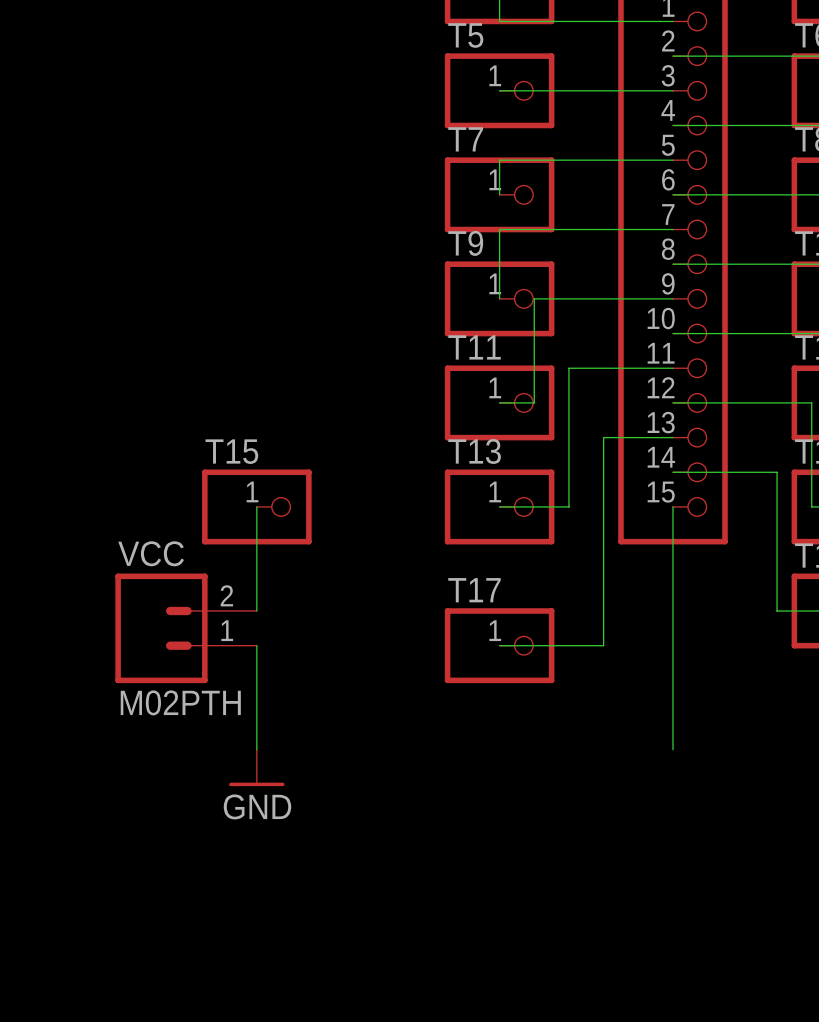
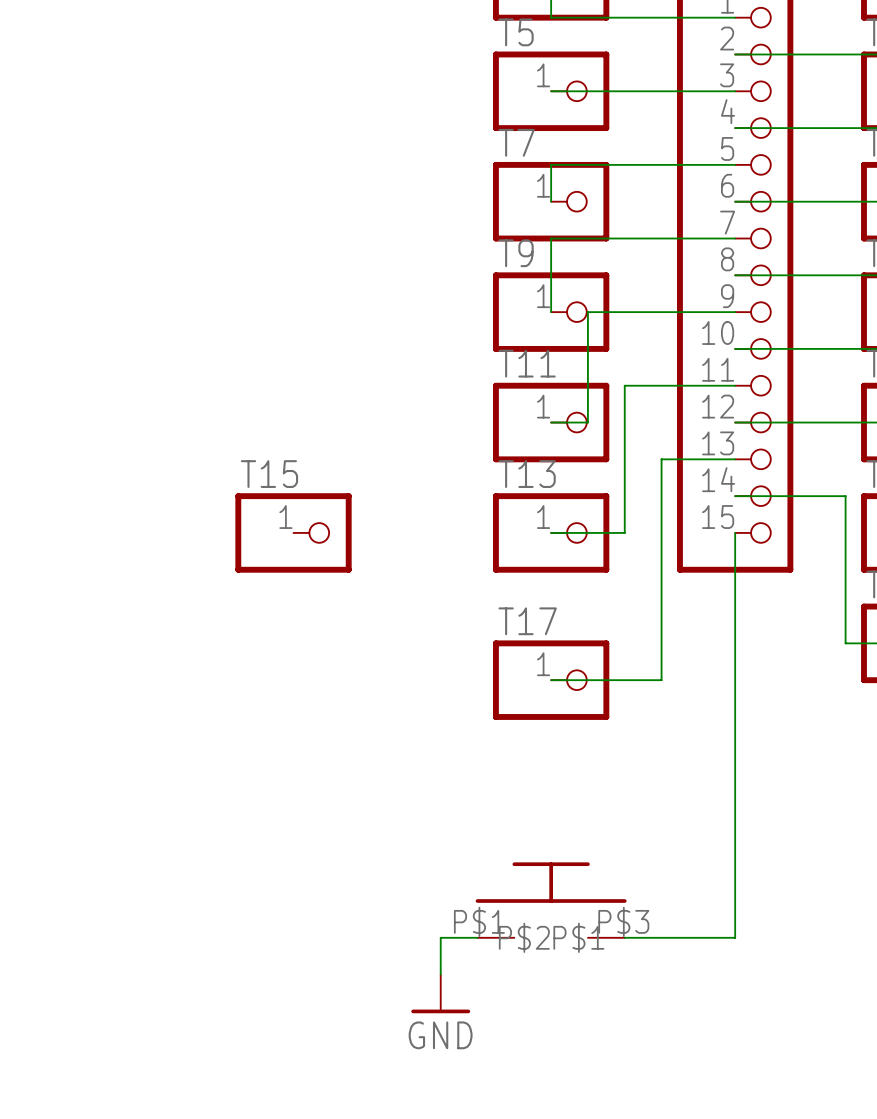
wire: (256, 506) (256, 611) -> none
VCC: M02PTH (186, 628) -> none
wire: (256, 645) (256, 749) -> none
wire: none -> (735, 790) (735, 937) (624, 937)
power symbol position: GND (256, 767) -> GND (440, 993)
part: none -> (551, 900)
wire: none -> (477, 937) (440, 937) (440, 974)

